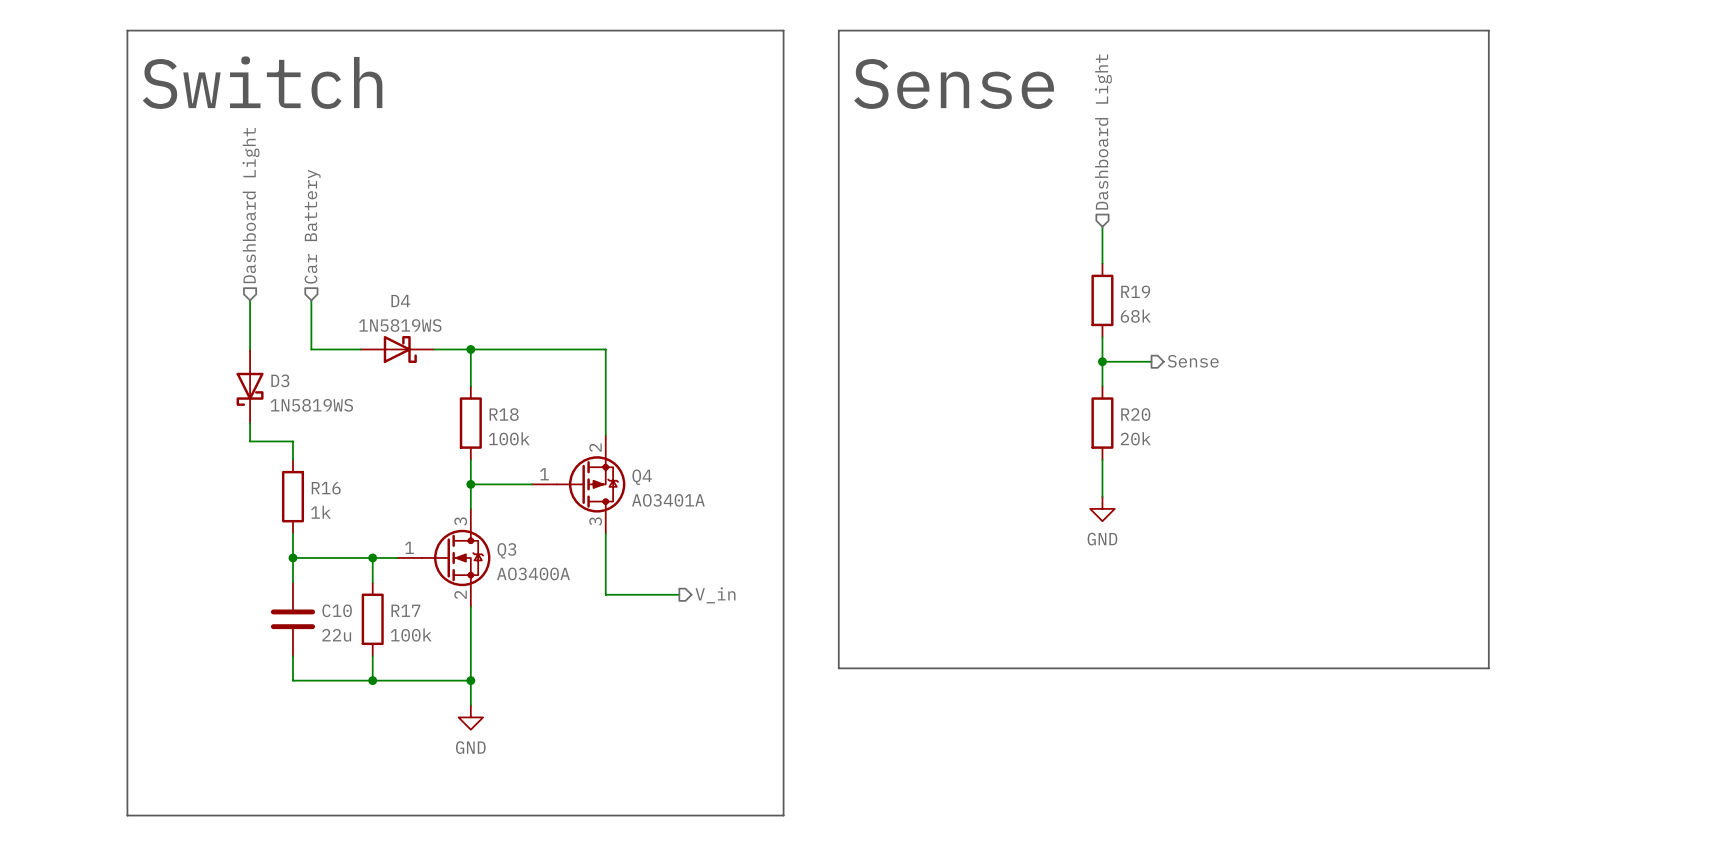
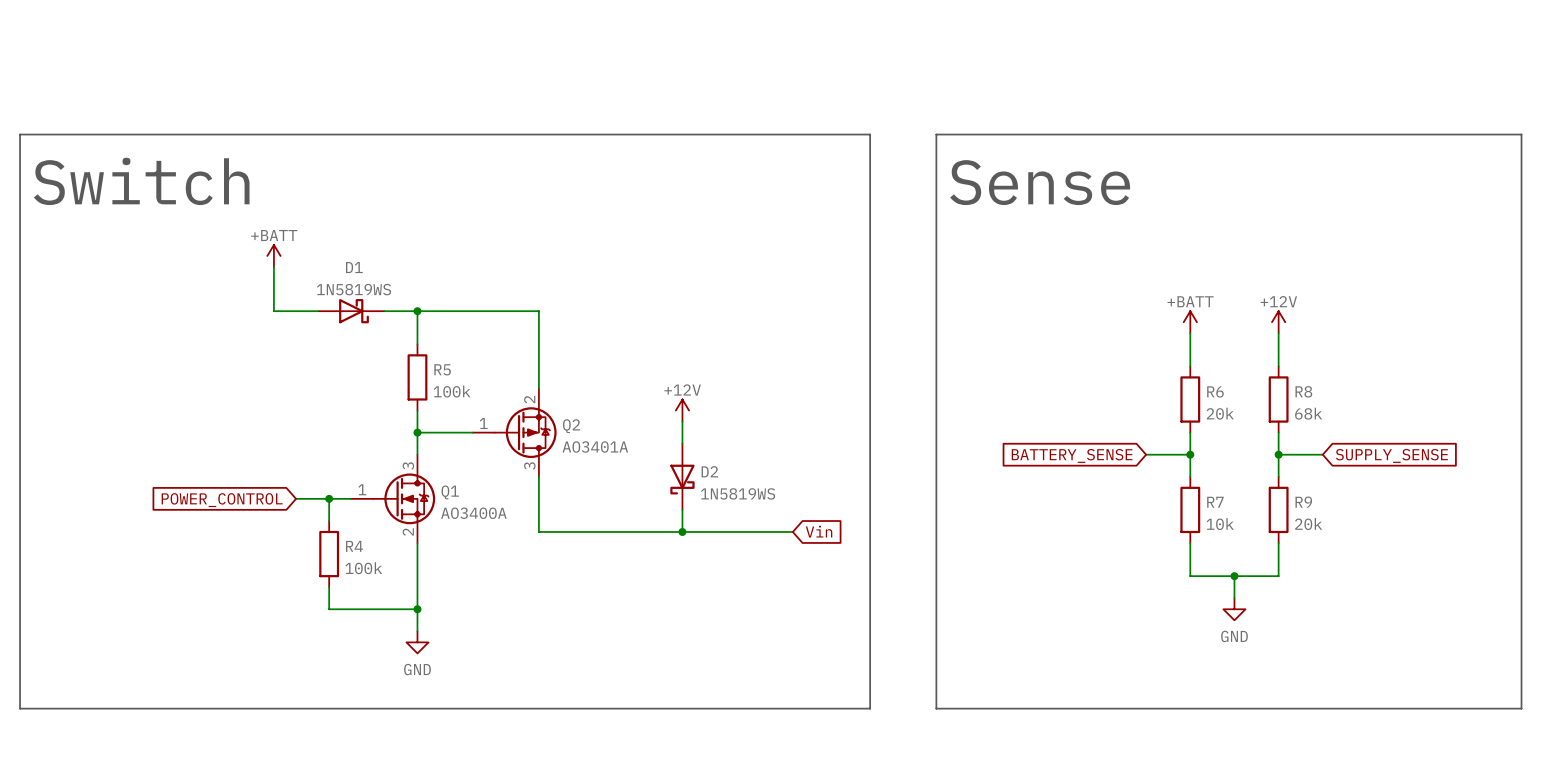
line: (127, 30) (127, 815) (783, 815) (783, 30) (127, 30) -> (20, 134) (20, 708) (870, 708) (870, 134) (20, 134)
line: (838, 30) (1488, 30) (1488, 668) (838, 668) (838, 30) -> none
text position: Switch (262, 82) -> Switch (141, 181)
text: Sense (954, 83) -> none
hierarchical label: Dashboard Light (1103, 131) -> none
line: none -> (936, 134) (1521, 134) (1521, 708) (936, 708) (936, 134)
hierarchical label: Dashboard Light (251, 205) -> none
text: none -> Sense (1040, 182)
hierarchical label: Car Battery (312, 226) -> none
wire: (1102, 226) (1102, 263) -> none
power symbol: none -> +BATT (273, 255)
wire: (250, 300) (250, 349) -> none
R19: 68k (1102, 300) -> none
D4 name: D4 (400, 301) -> D1 (354, 267)
wire: (1102, 337) (1102, 386) -> none
wire: (1102, 361) (1151, 361) -> (1146, 454) (1190, 454)
junction: (1102, 361) -> none
hierarchical label: Sense (1193, 361) -> none
power symbol: none -> +BATT (1190, 322)
power symbol: none -> +12V (1278, 322)
wire: none -> (1190, 333) (1190, 366)
wire: none -> (1278, 333) (1278, 366)
D3: 1N5819WS (250, 386) -> none
R18 name: R18 (504, 414) -> R5 (442, 369)
wire: (250, 423) (250, 441) (292, 441) (292, 459) -> none
R20: 20k (1102, 423) -> none
R6: none -> 20k (1190, 399)
R8: none -> 68k (1278, 399)
power symbol: none -> +12V (682, 410)
wire: (1102, 459) (1102, 496) -> none
wire: none -> (682, 421) (682, 443)
Q4 name: Q4 (642, 477) -> Q2 (571, 426)
wire: none -> (1190, 432) (1190, 476)
wire: none -> (1278, 432) (1278, 476)
R16: 1k (292, 496) -> none
power symbol: GND (1102, 508) -> none
junction: none -> (1190, 454)
wire: none -> (1278, 454) (1322, 454)
junction: none -> (1278, 454)
global label: none -> BATTERY_SENSE (1072, 455)
global label: none -> SUPPLY_SENSE (1391, 455)
wire: (292, 533) (292, 582) -> none
D2: none -> 1N5819WS (682, 476)
Q3 name: Q3 (506, 550) -> Q1 (450, 492)
wire: (292, 557) (335, 557) -> none
junction: (292, 557) -> none
global label: none -> POWER_CONTROL (222, 500)
wire: none -> (682, 509) (682, 531)
R7: none -> 10k (1190, 509)
R9: none -> 20k (1278, 509)
wire: none -> (605, 531) (792, 531)
junction: none -> (682, 531)
global label: none -> Vin (819, 531)
hierarchical label: V_in (715, 595) -> none
wire: none -> (1190, 543) (1190, 576) (1278, 576) (1278, 543)
R17 name: R17 (405, 610) -> R4 (354, 546)
C10: 22u (292, 619) -> none
wire: none -> (1234, 576) (1234, 598)
junction: none -> (1234, 576)
wire: (292, 656) (292, 680) (372, 680) -> none
junction: (372, 680) -> none
power symbol: none -> GND (1234, 609)

